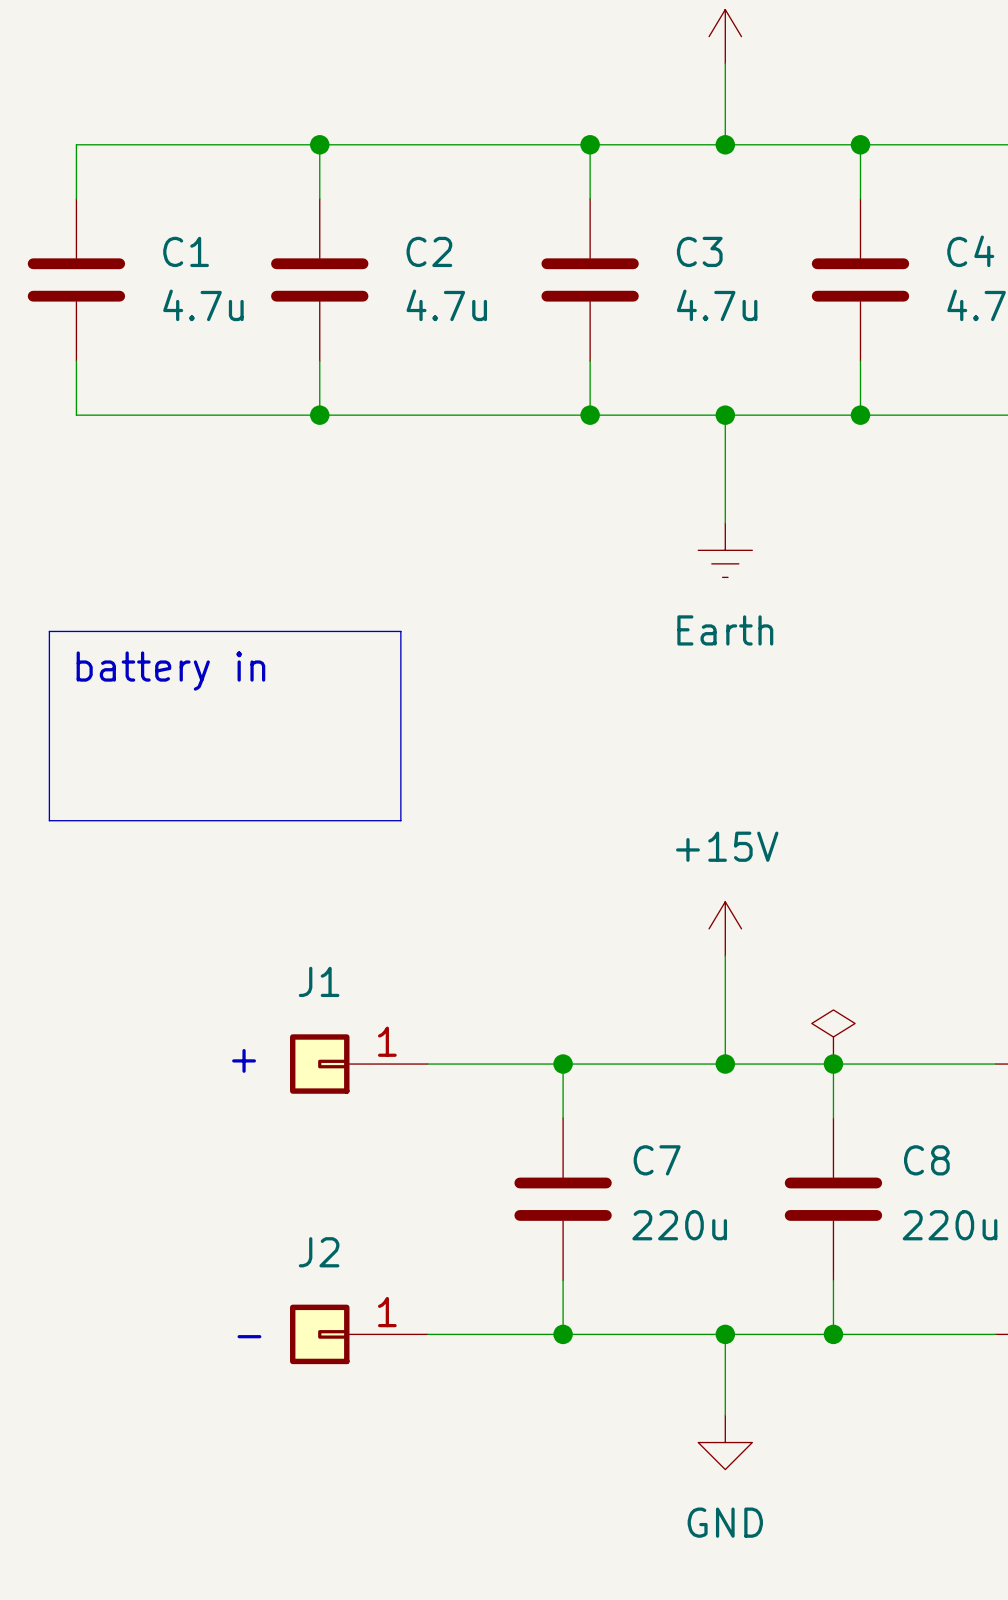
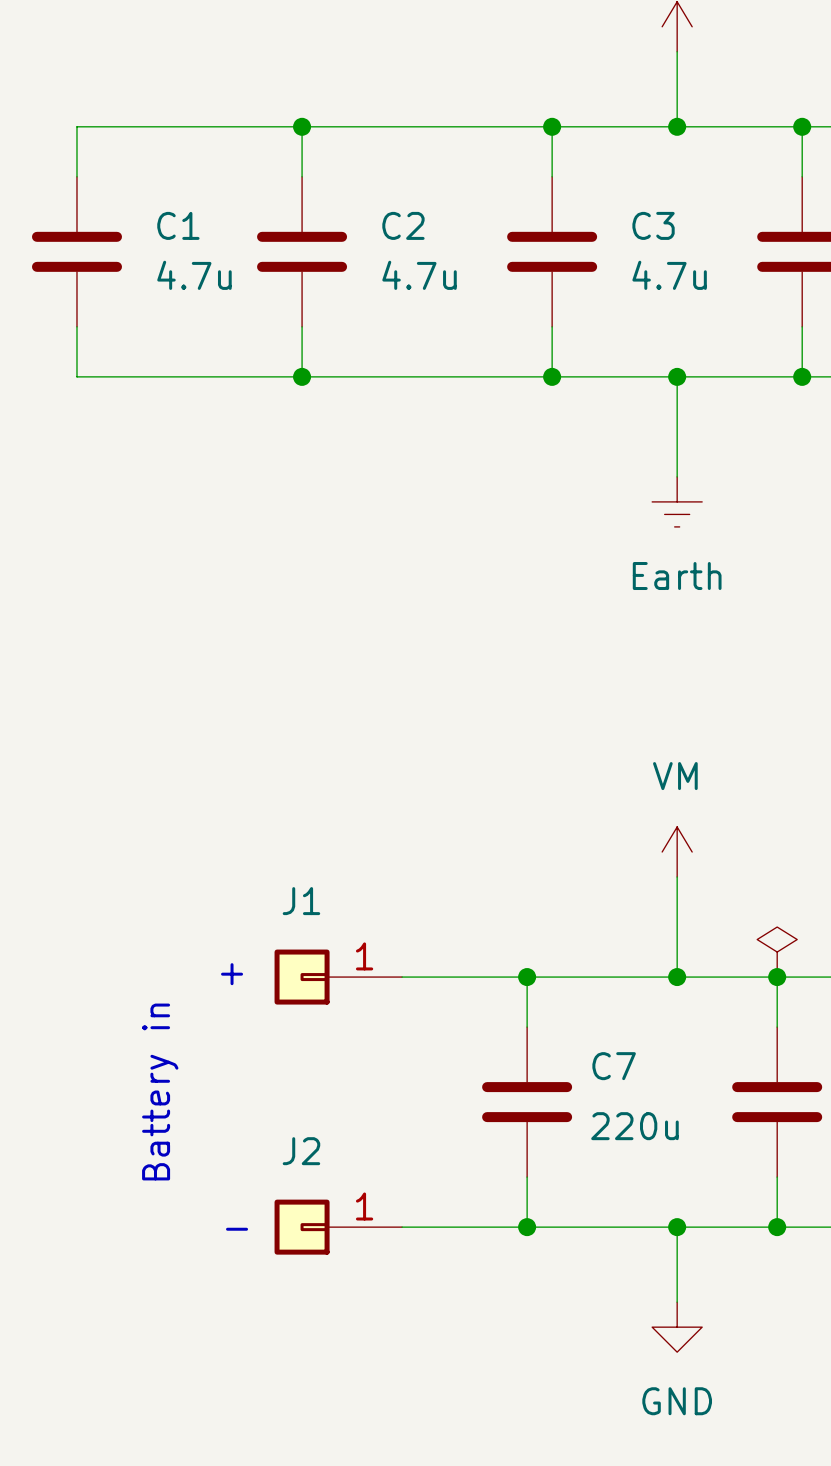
line: (49, 631) (400, 631) (400, 820) (49, 820) (49, 631) -> none
text: battery in (170, 671) -> none
power symbol: +15V (725, 928) -> VM (677, 852)
text: none -> Battery in (160, 1092)

